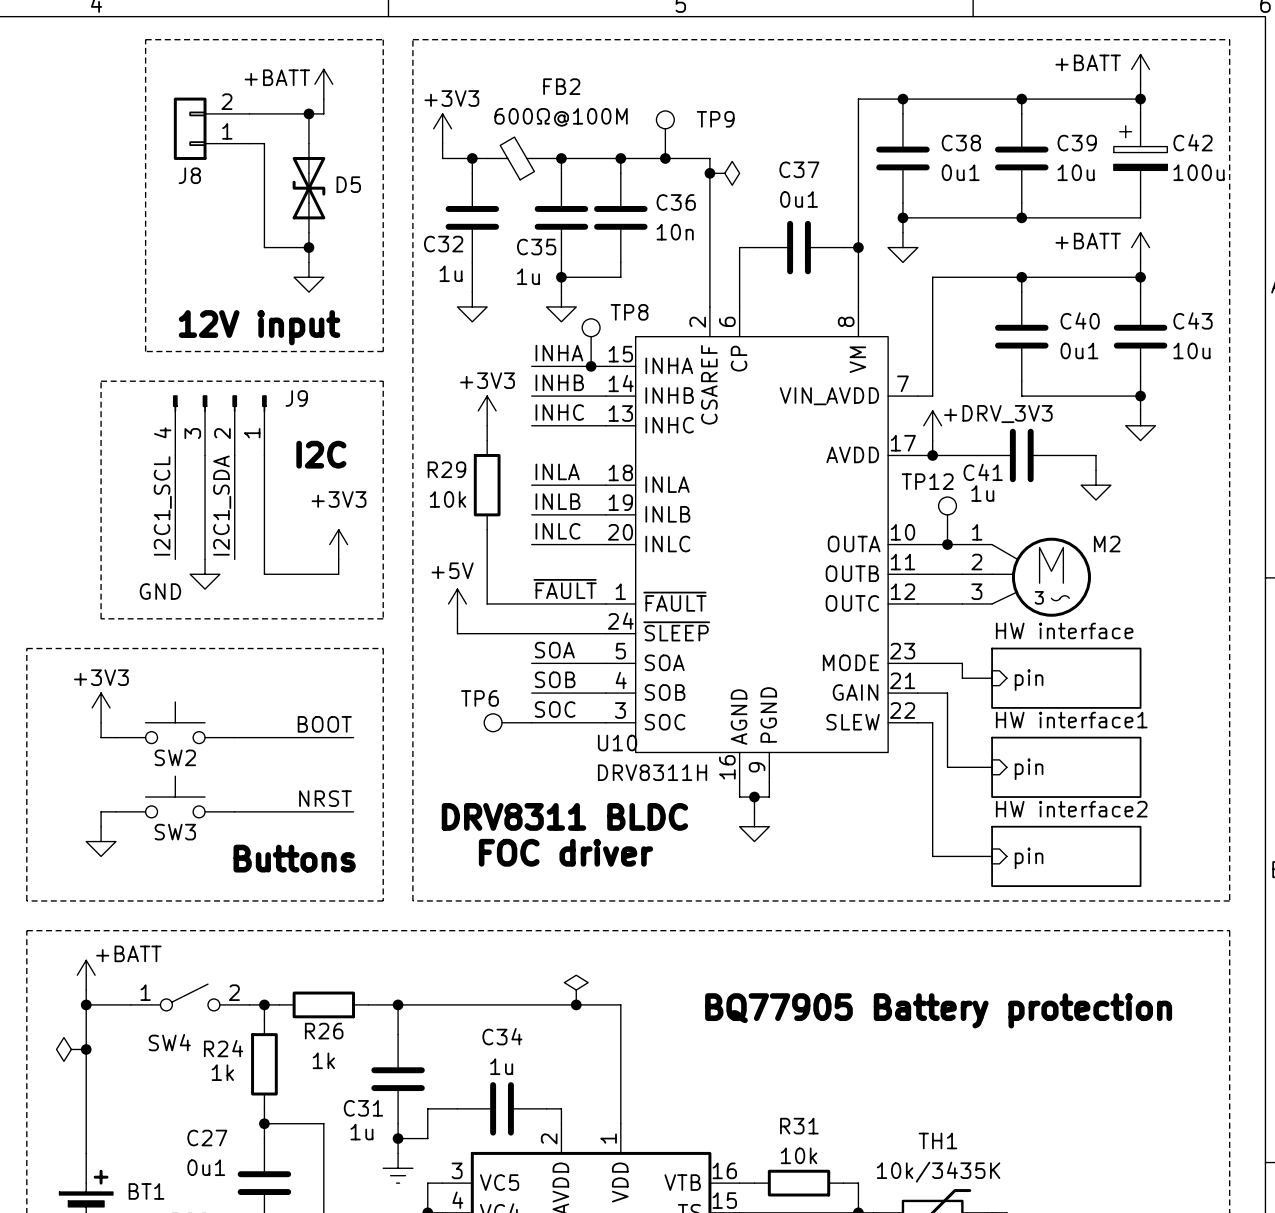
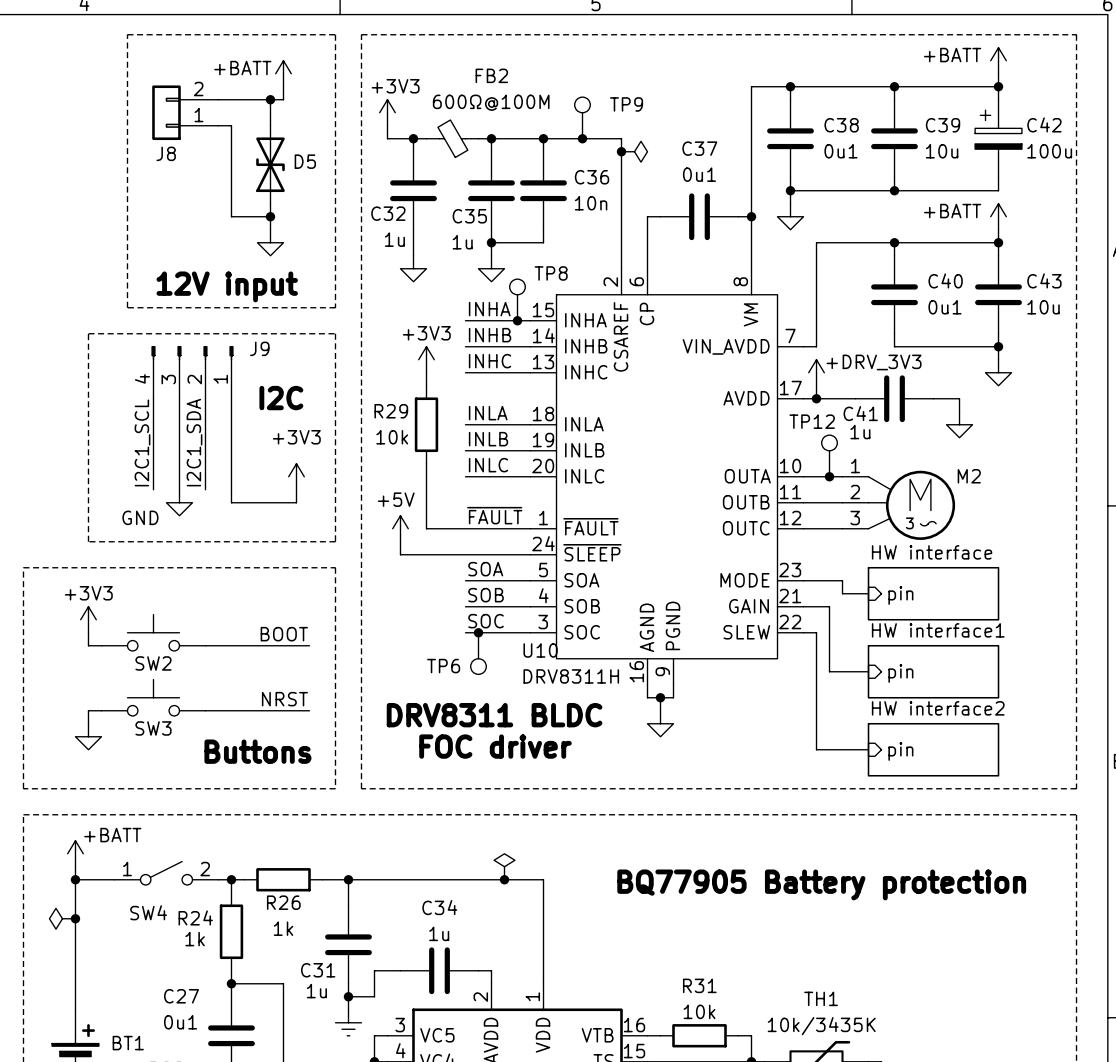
TP6 name position: TP6 (479, 698) -> TP6 (443, 666)
TP6 rotation: 0° (493, 722) -> 90° counterclockwise (478, 666)
TP6 position: (507, 722) -> (478, 653)
junction: none -> (478, 632)

